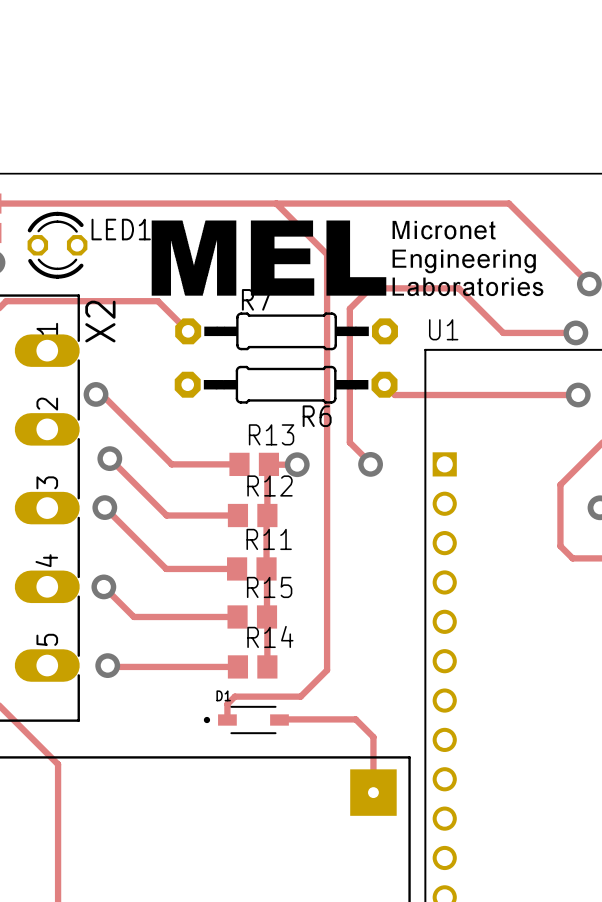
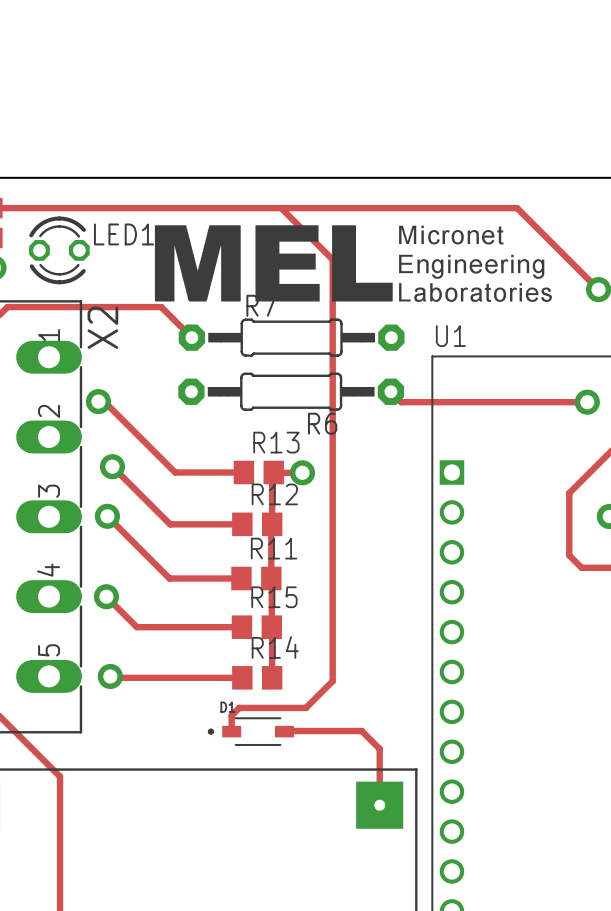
track: (575, 332) (503, 332) (458, 288) (370, 288) (349, 308) (349, 442) (370, 464) -> none
via: (575, 332) -> none
via: (370, 464) -> none

